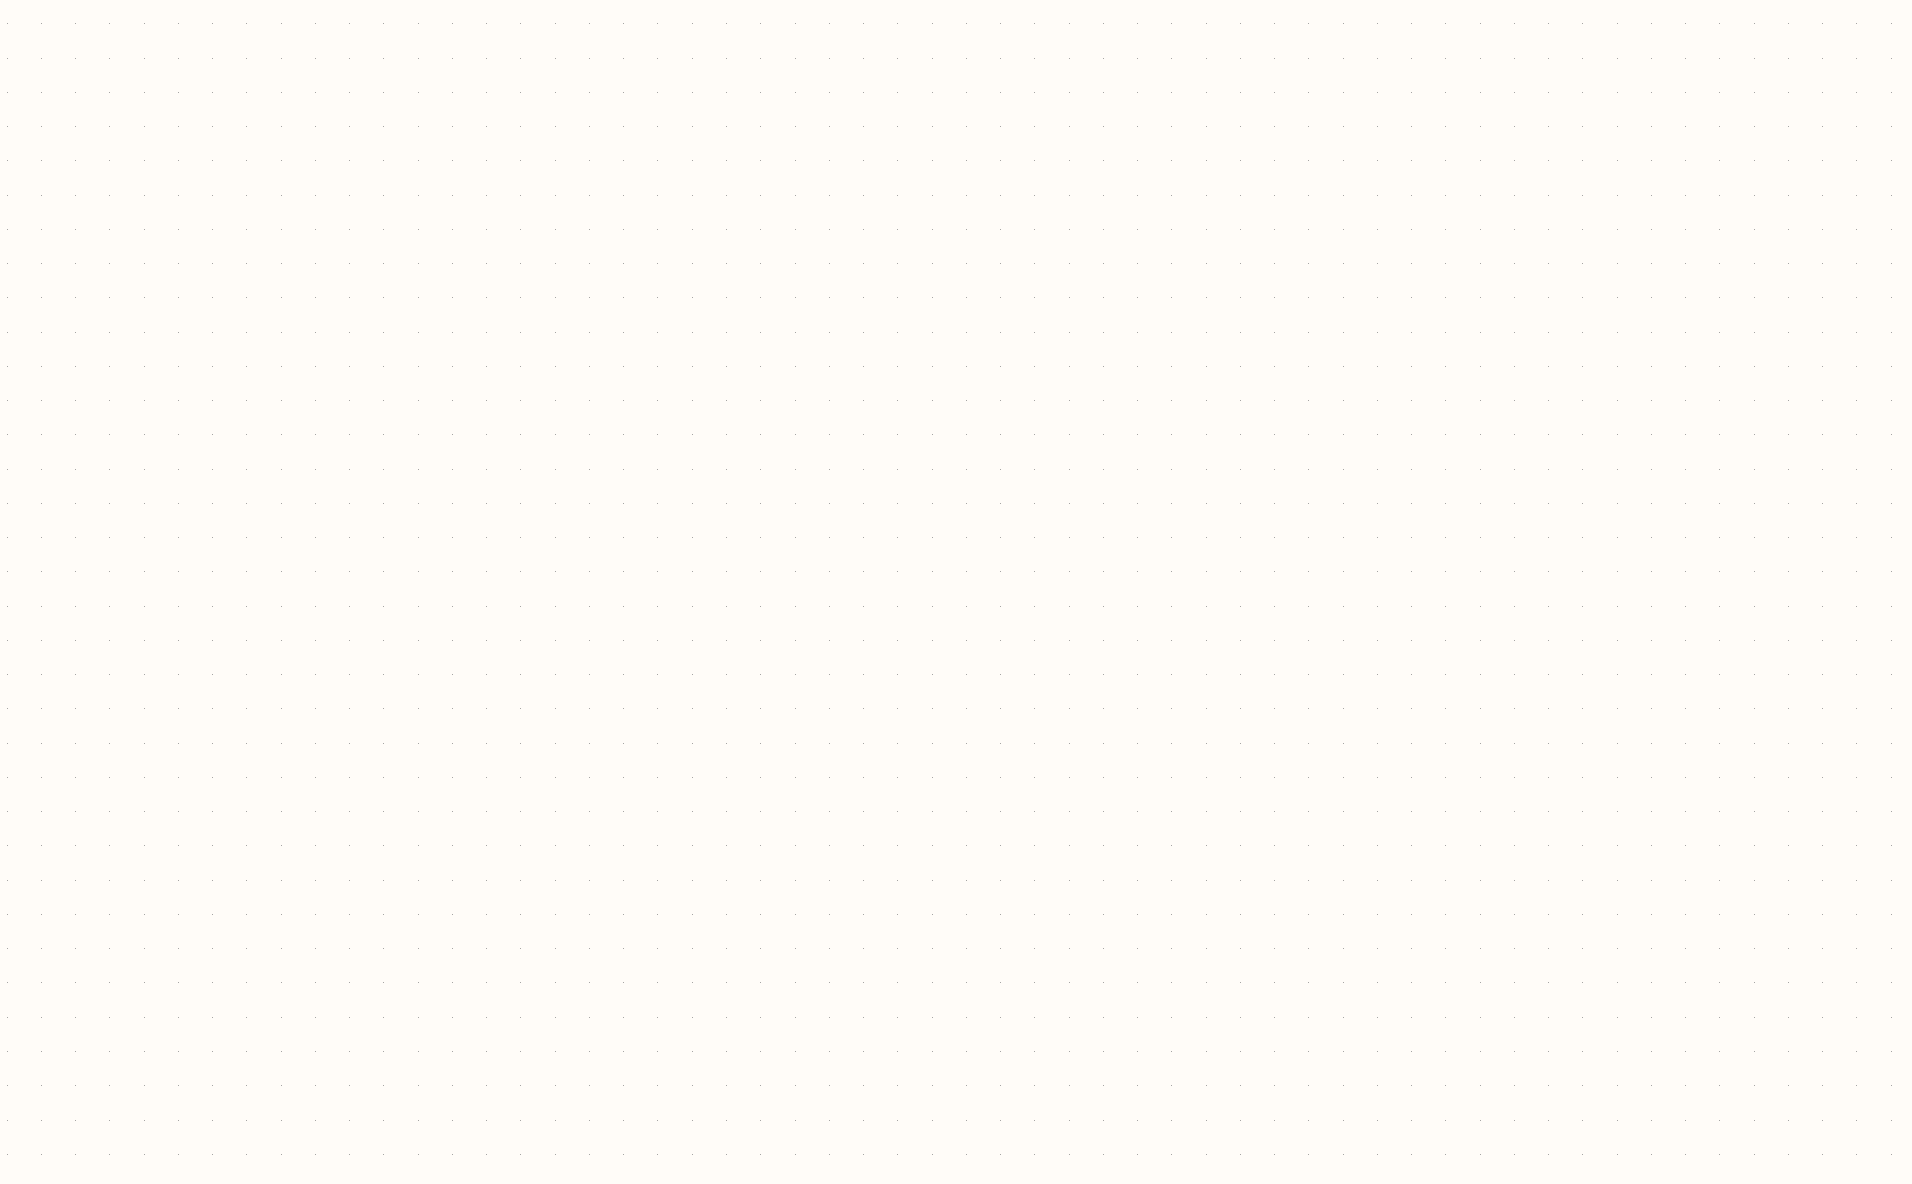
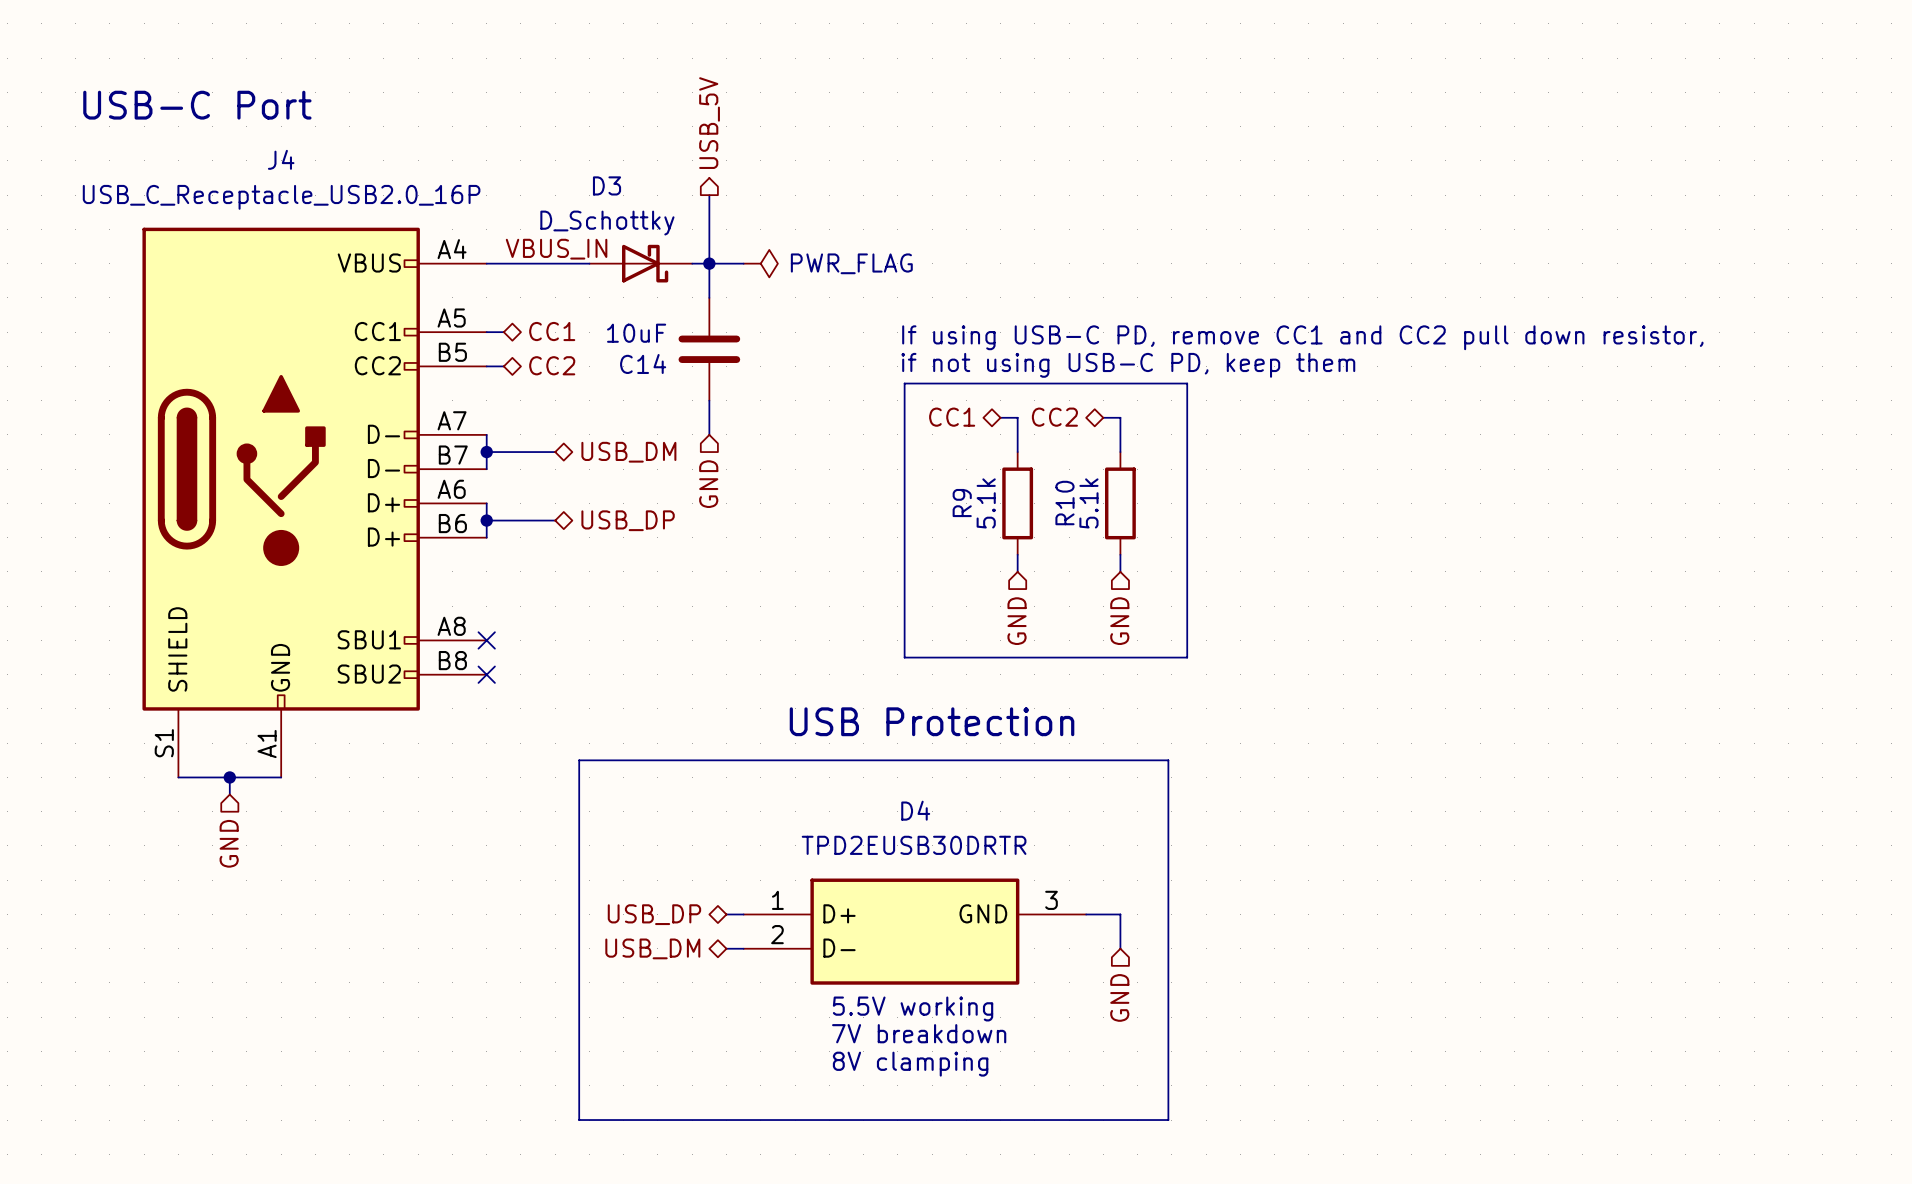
text: none -> USB-C Port (197, 105)
hierarchical label: none -> USB_5V (709, 123)
wire: none -> (709, 195) (709, 297)
label: none -> VBUS_IN (556, 249)
wire: none -> (486, 263) (589, 263)
D3: none -> D_Schottky (640, 263)
wire: none -> (692, 263) (743, 263)
junction: none -> (709, 263)
power symbol: none -> PWR_FLAG (760, 263)
hierarchical label: none -> CC1 (552, 331)
wire: none -> (486, 332) (503, 332)
text: none -> If using USB-C PD, remove CC1 and CC2 pull down resistor, (1302, 337)
C14: none -> 10uF (709, 349)
hierarchical label: none -> CC2 (552, 365)
text: none -> if not using USB-C PD, keep them (1128, 365)
wire: none -> (486, 366) (503, 366)
line: none -> (904, 383) (1187, 383) (1187, 657) (904, 657) (904, 383)
wire: none -> (709, 400) (709, 434)
hierarchical label: none -> CC1 (952, 417)
wire: none -> (1000, 417) (1017, 417) (1017, 452)
hierarchical label: none -> CC2 (1054, 417)
wire: none -> (1103, 417) (1120, 417) (1120, 452)
wire: none -> (486, 434) (486, 469)
wire: none -> (486, 452) (555, 452)
junction: none -> (486, 452)
hierarchical label: none -> USB_DM (628, 452)
hierarchical label: none -> GND (708, 484)
J4: none -> USB_C_Receptacle_USB2.0_16P (314, 502)
wire: none -> (486, 503) (486, 537)
R9: none -> 5.1k (1017, 503)
R10: none -> 5.1k (1120, 503)
wire: none -> (486, 520) (555, 520)
junction: none -> (486, 520)
hierarchical label: none -> USB_DP (628, 520)
wire: none -> (1017, 554) (1017, 571)
wire: none -> (1120, 554) (1120, 571)
hierarchical label: none -> GND (1017, 621)
hierarchical label: none -> GND (1119, 621)
no-connect mark: none -> (486, 640)
no-connect mark: none -> (486, 674)
text: none -> USB Protection (932, 721)
line: none -> (579, 760) (1168, 760) (1168, 1120) (579, 1120) (579, 760)
wire: none -> (178, 777) (281, 777)
wire: none -> (229, 777) (229, 794)
junction: none -> (229, 777)
hierarchical label: none -> GND (229, 843)
hierarchical label: none -> USB_DP (654, 914)
wire: none -> (726, 914) (743, 914)
wire: none -> (1086, 914) (1120, 914) (1120, 948)
D4: none -> TPD2EUSB30DRTR (914, 931)
hierarchical label: none -> USB_DM (652, 948)
wire: none -> (726, 948) (743, 948)
hierarchical label: none -> GND (1119, 997)
text: none -> 5.5V working (913, 1008)
text: none -> 7V breakdown (919, 1033)
text: none -> 8V clamping (910, 1064)

